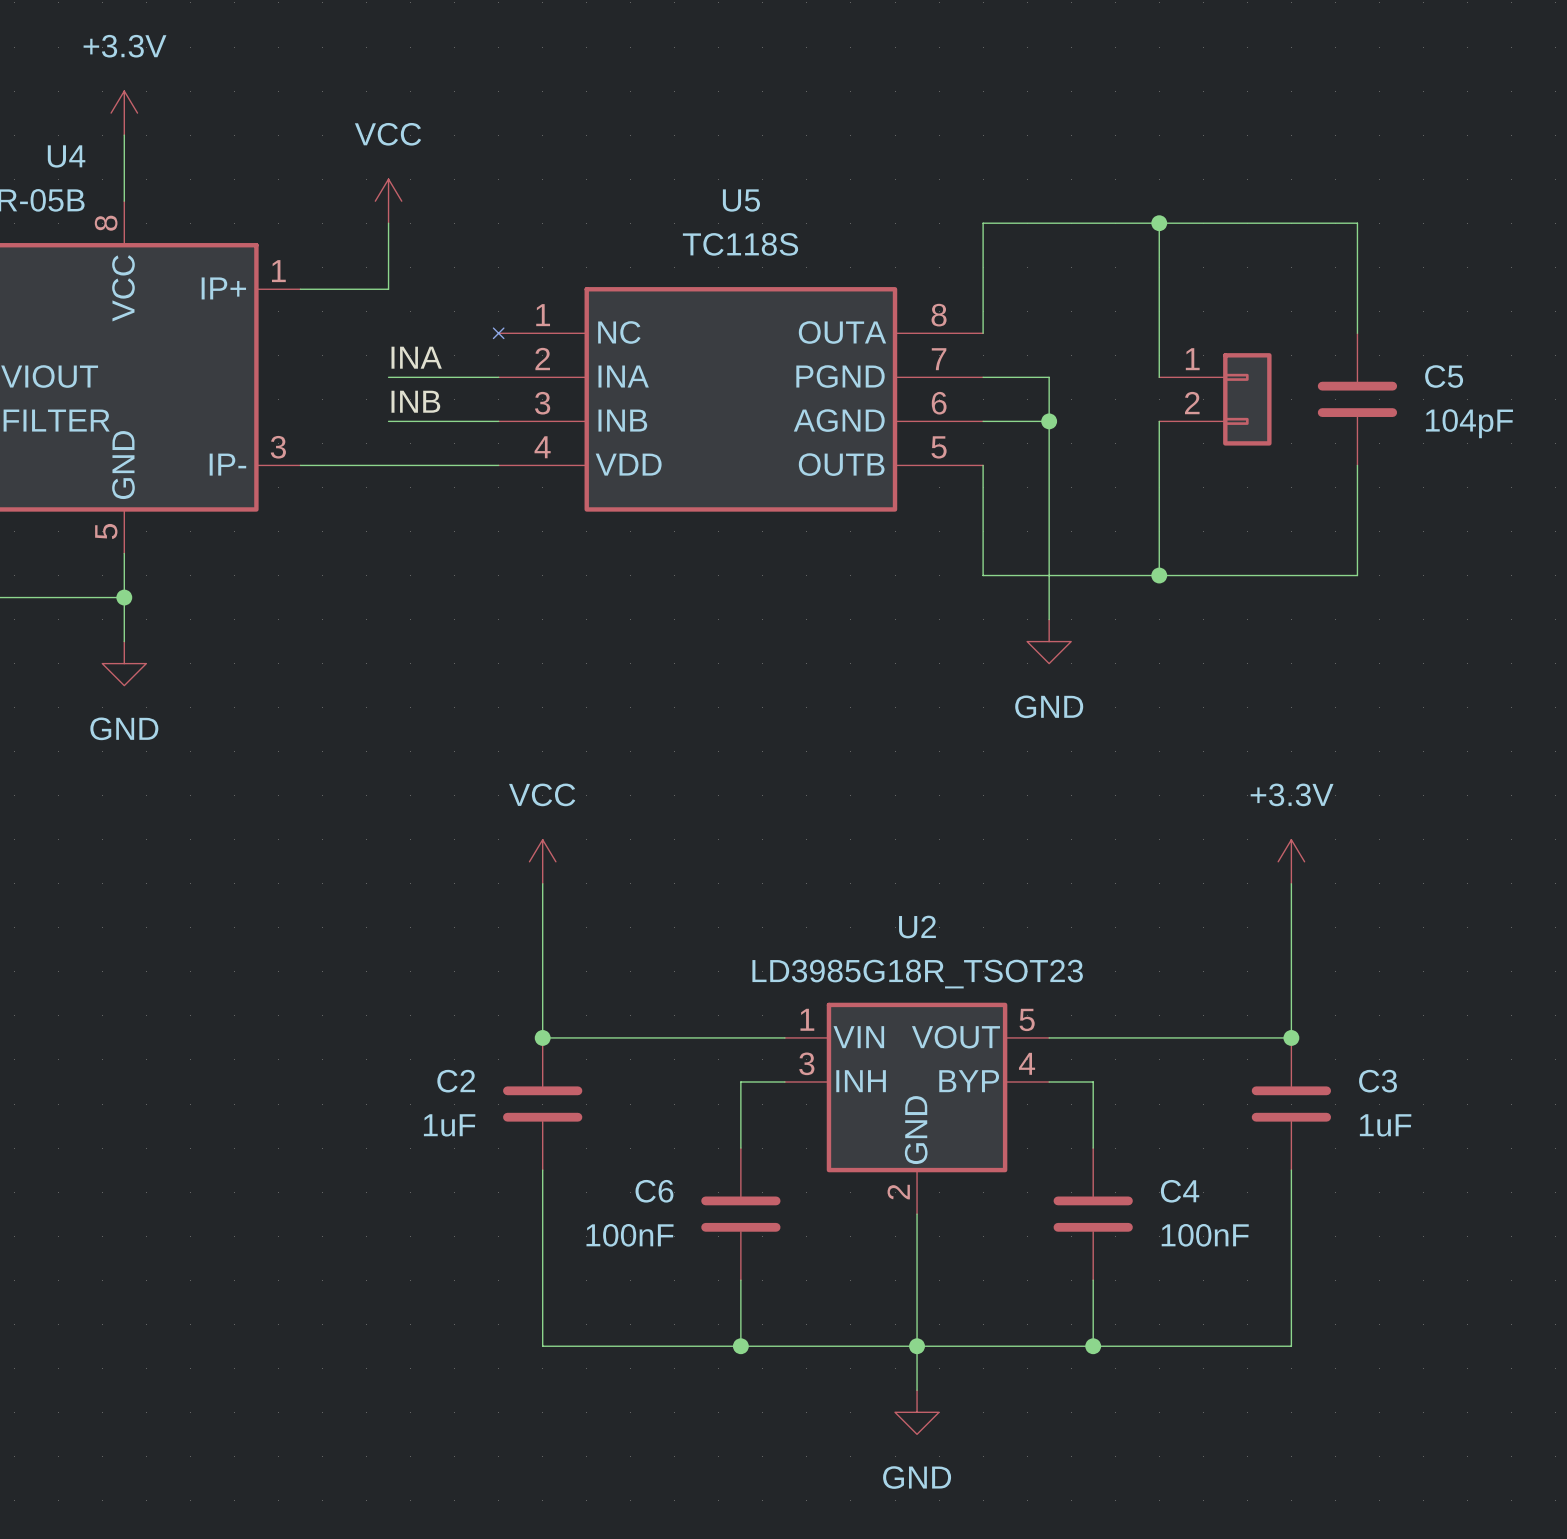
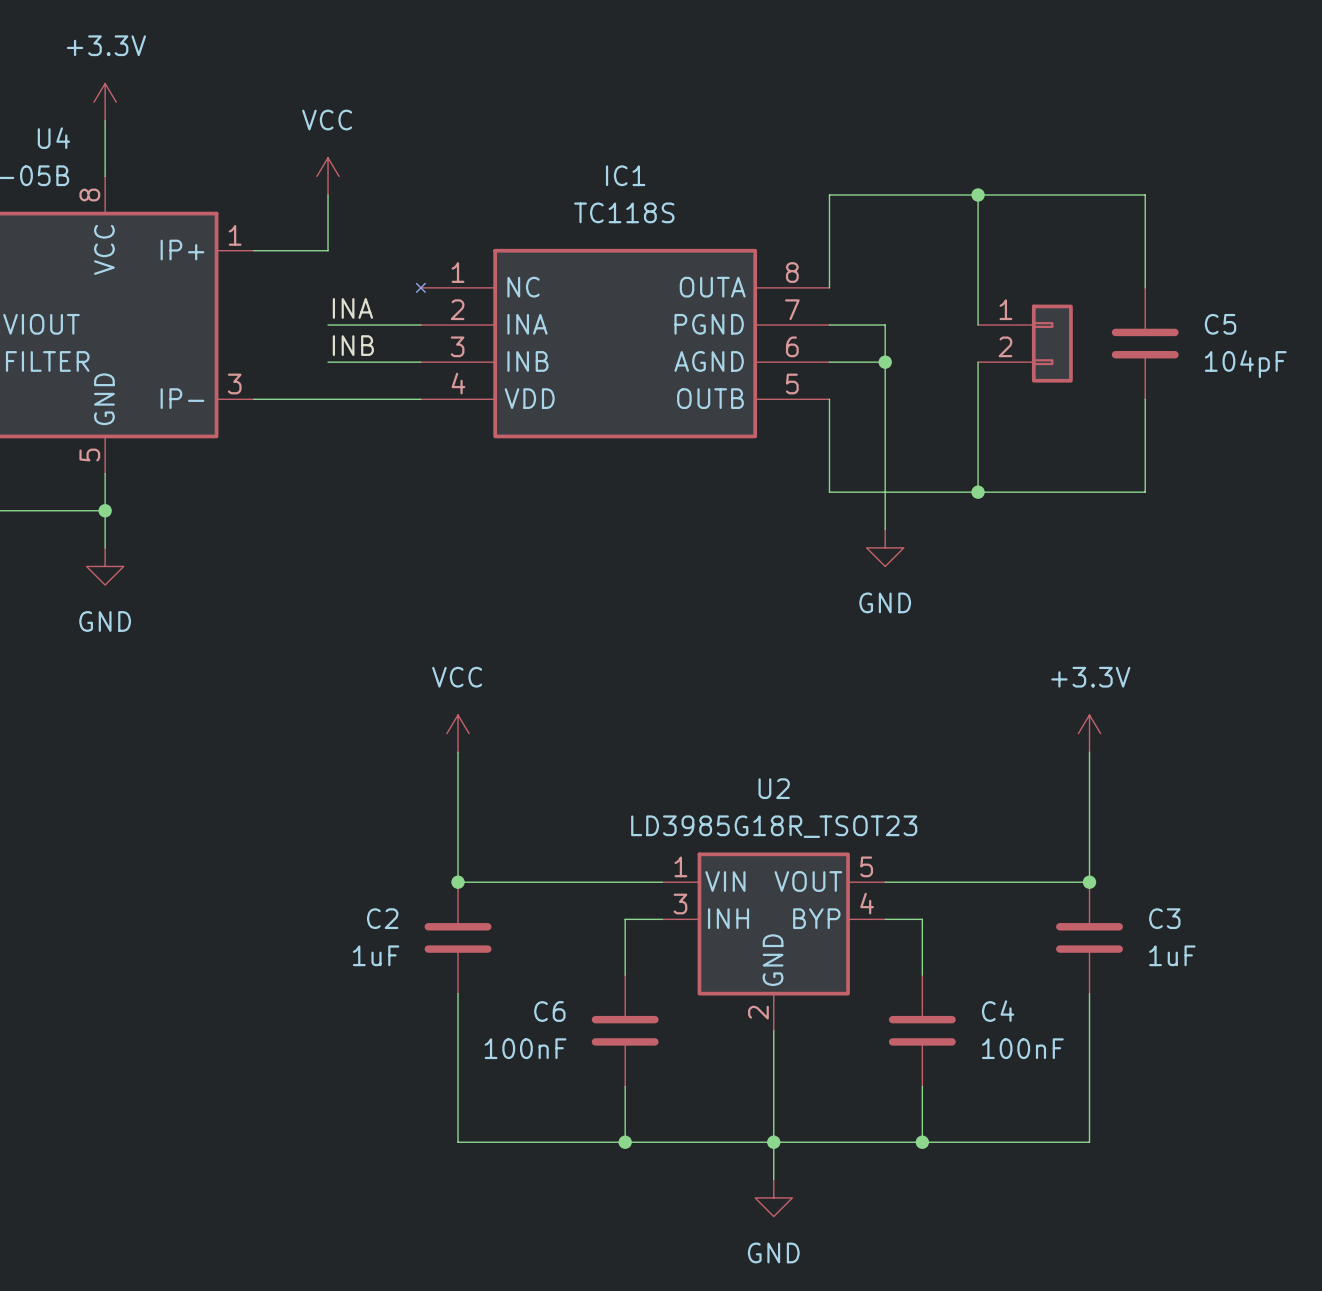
U5 name: U5 (741, 200) -> IC1 (625, 175)

